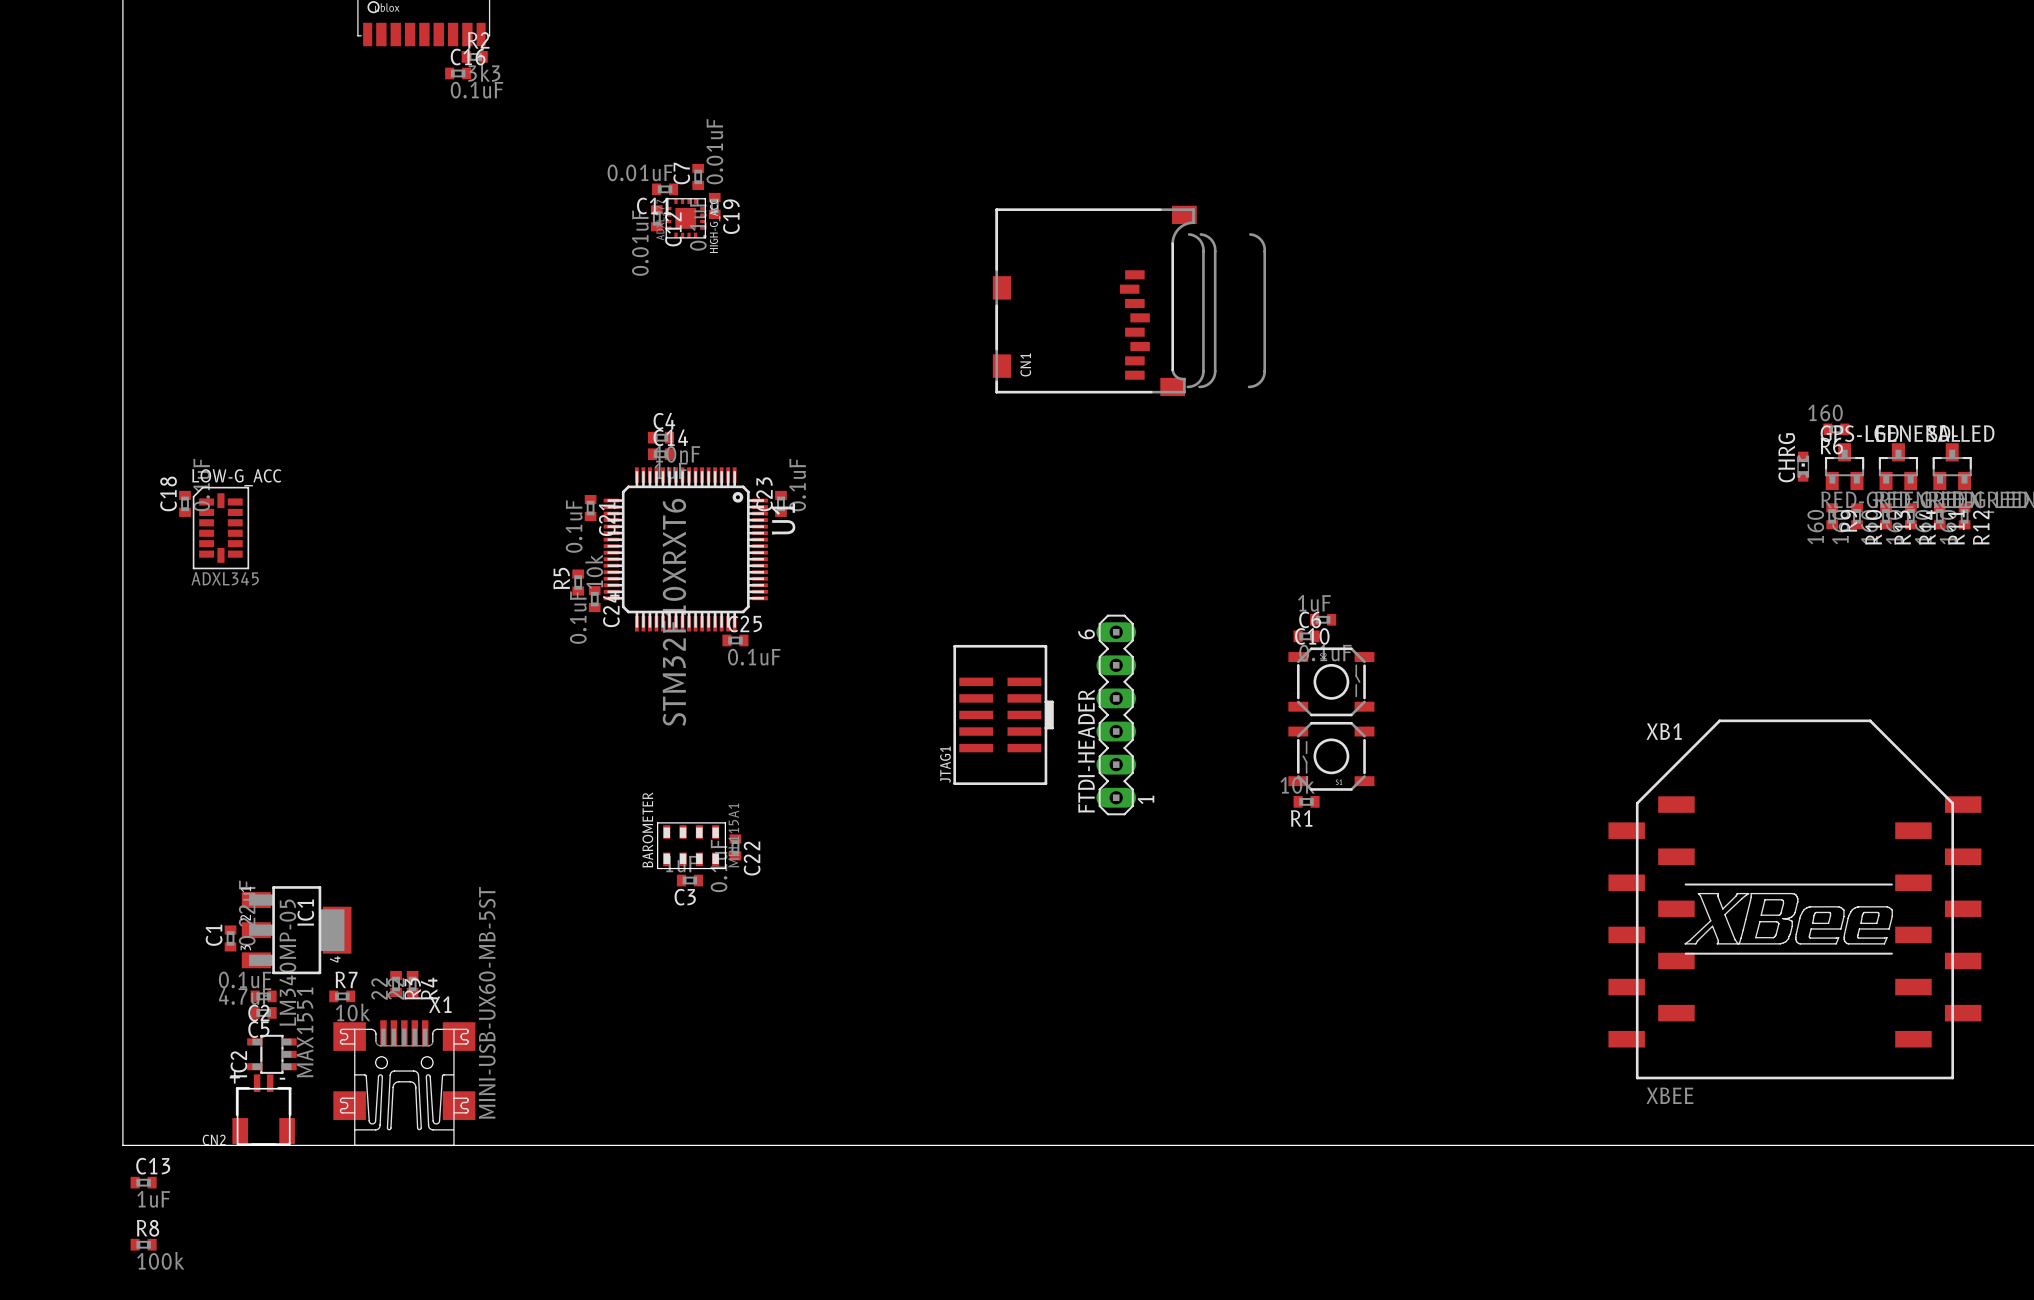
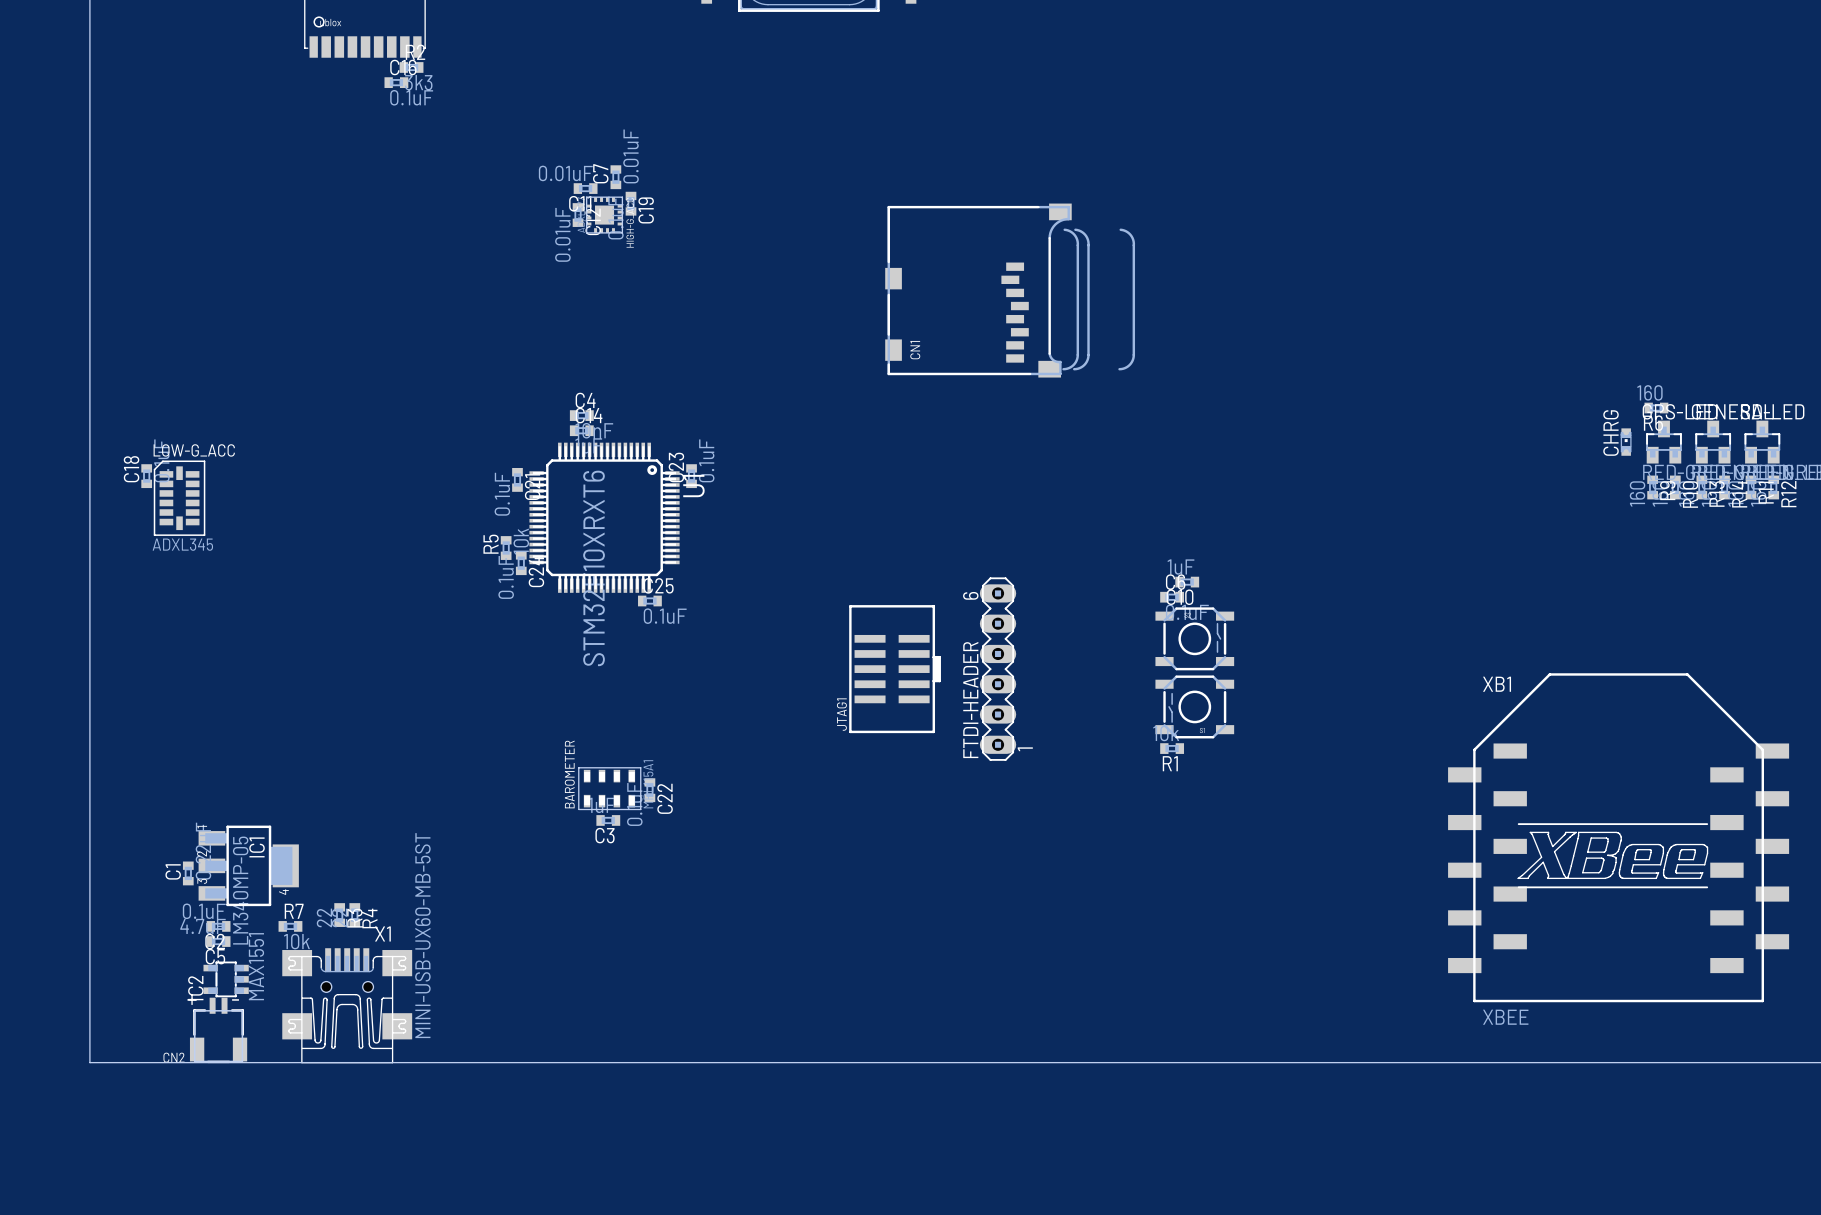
C13: 1uF (143, 1182) -> none
R8: 100k (143, 1244) -> none

